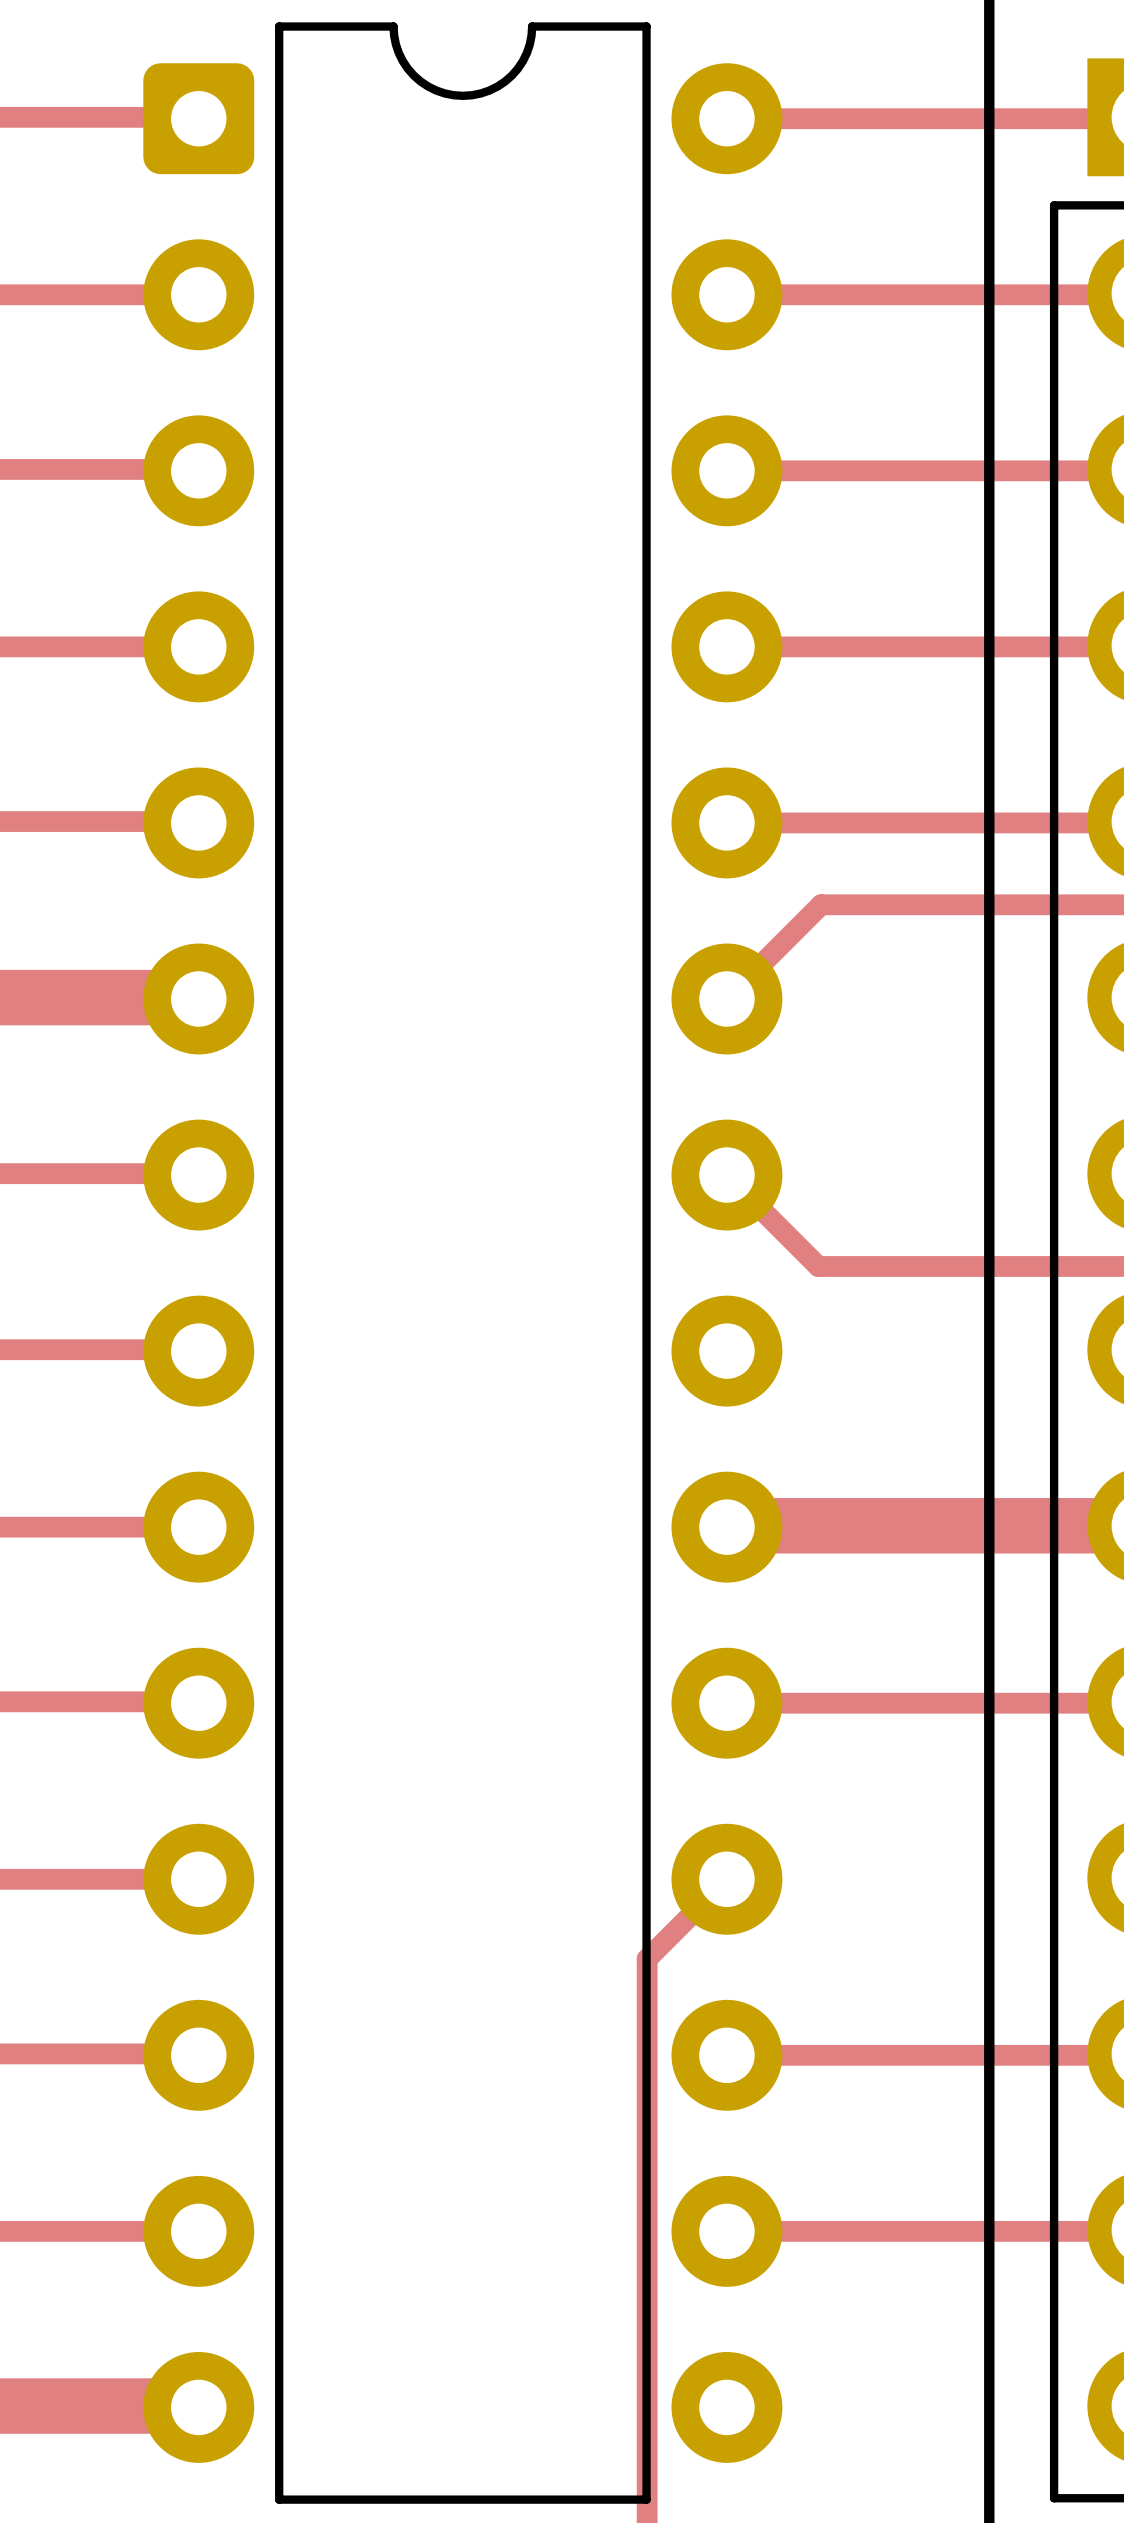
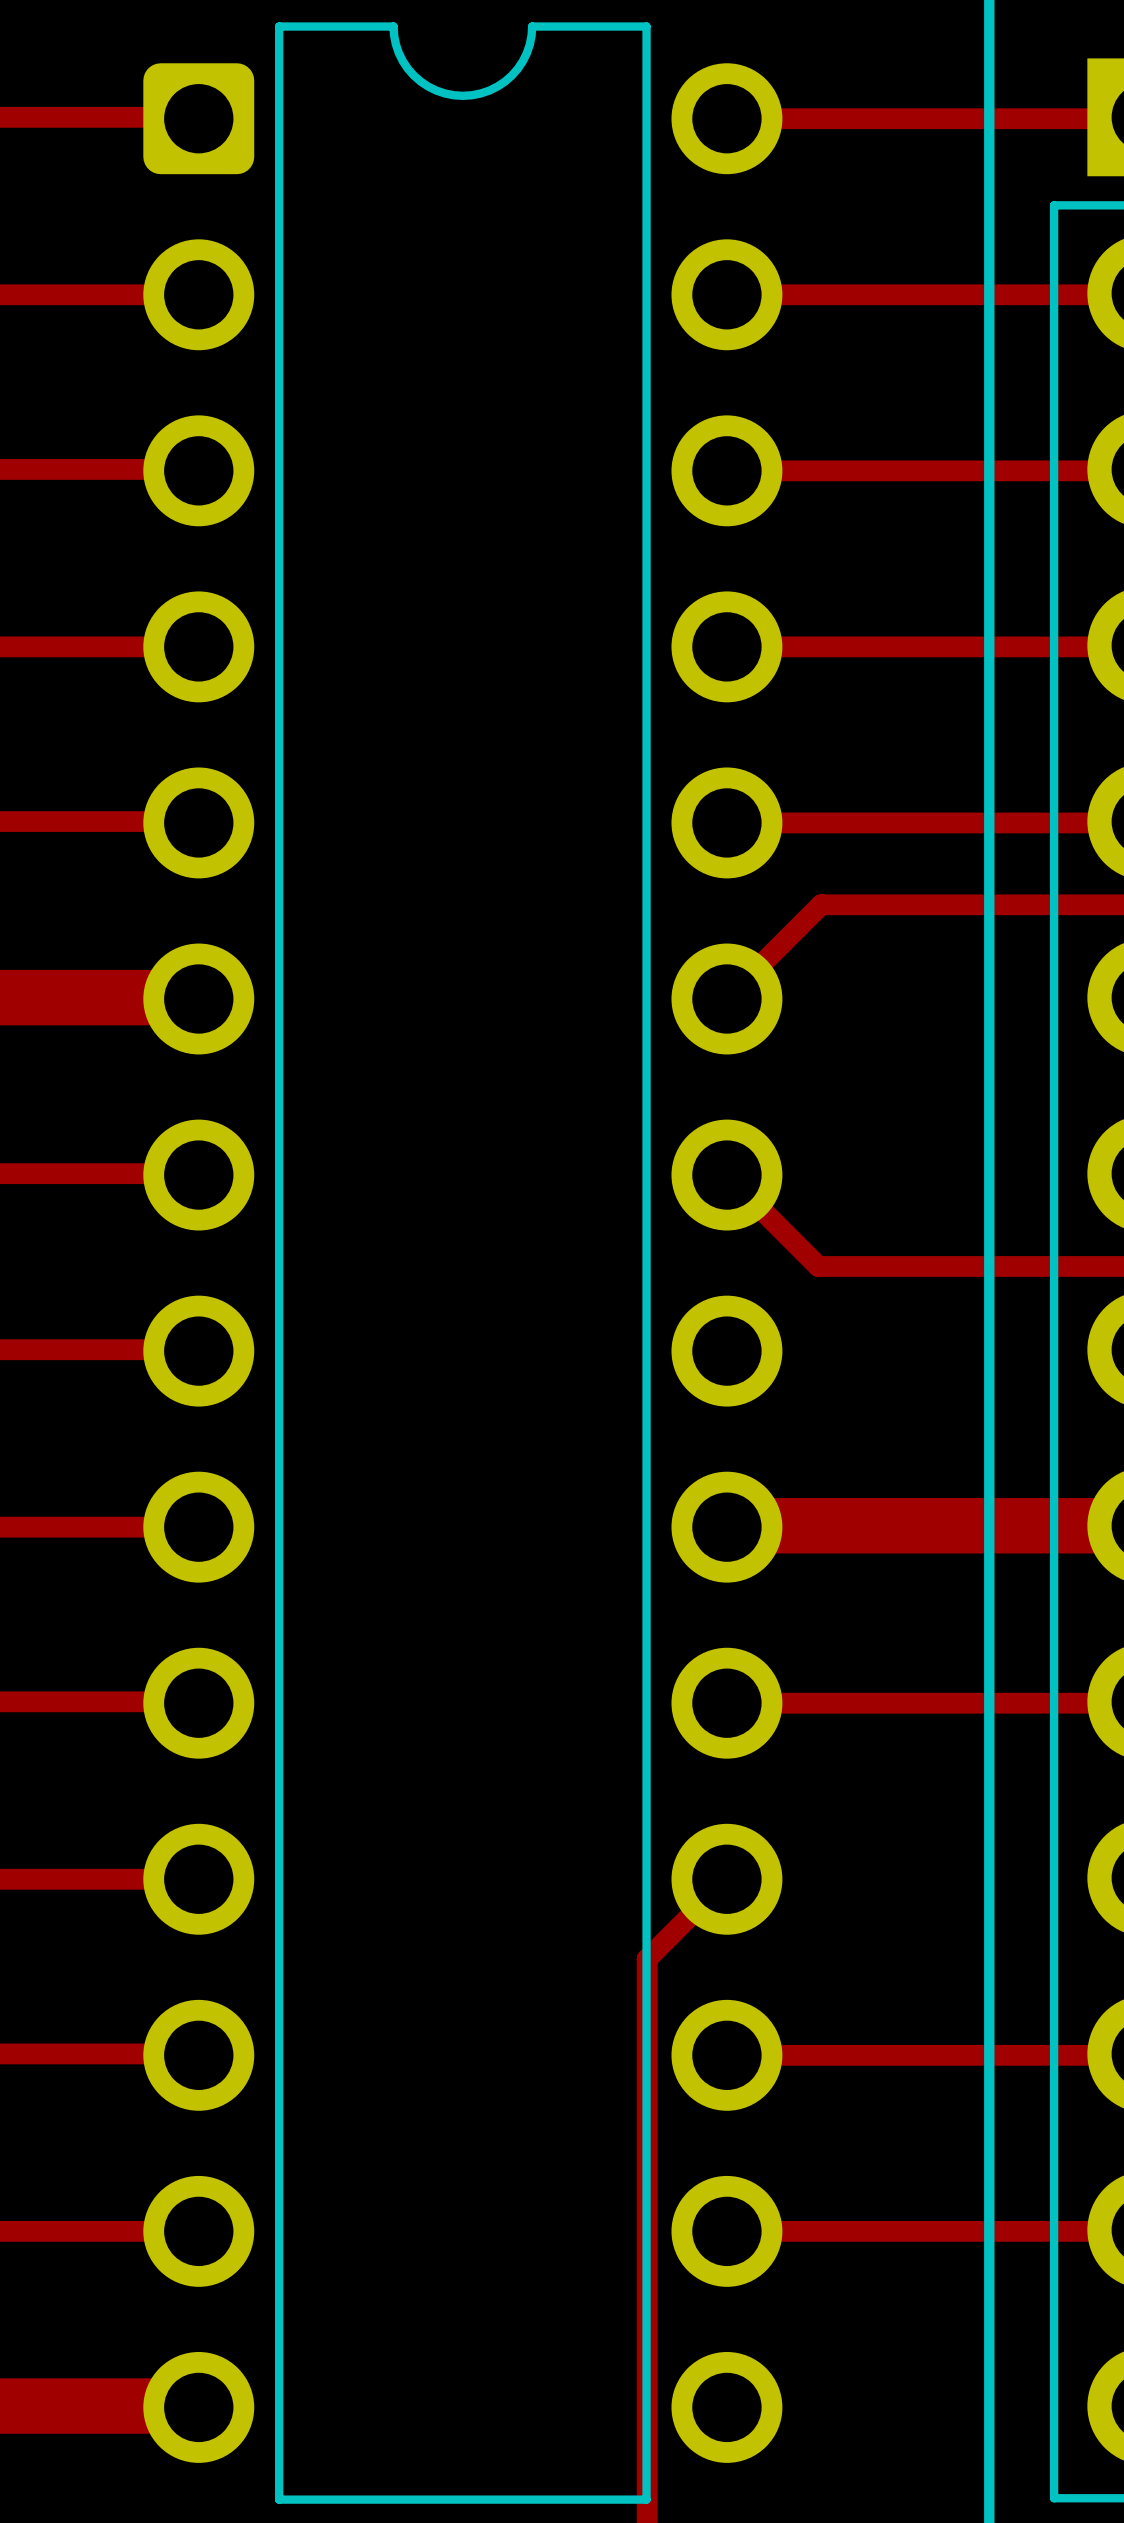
part footprint: [143, 22, 783, 2504] -> [143, 22, 783, 2504]

